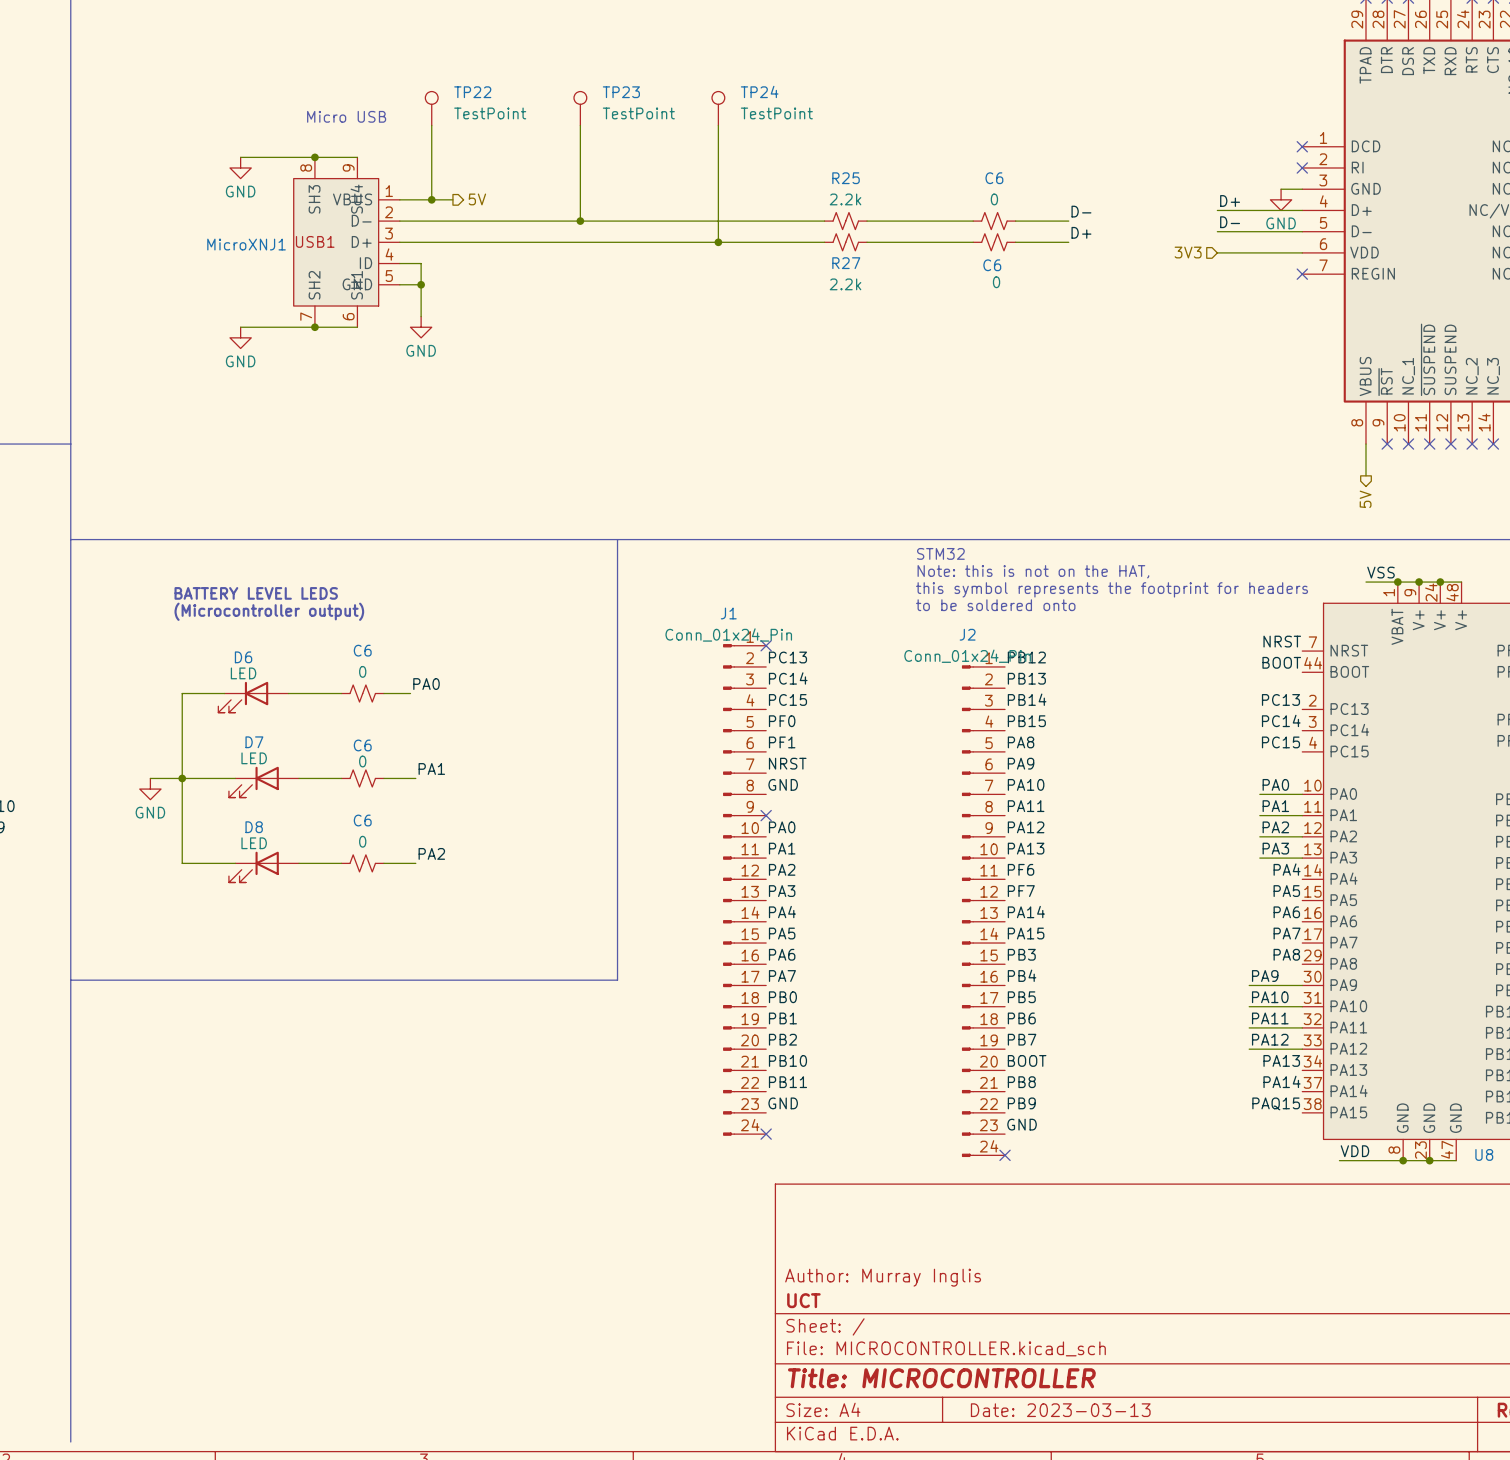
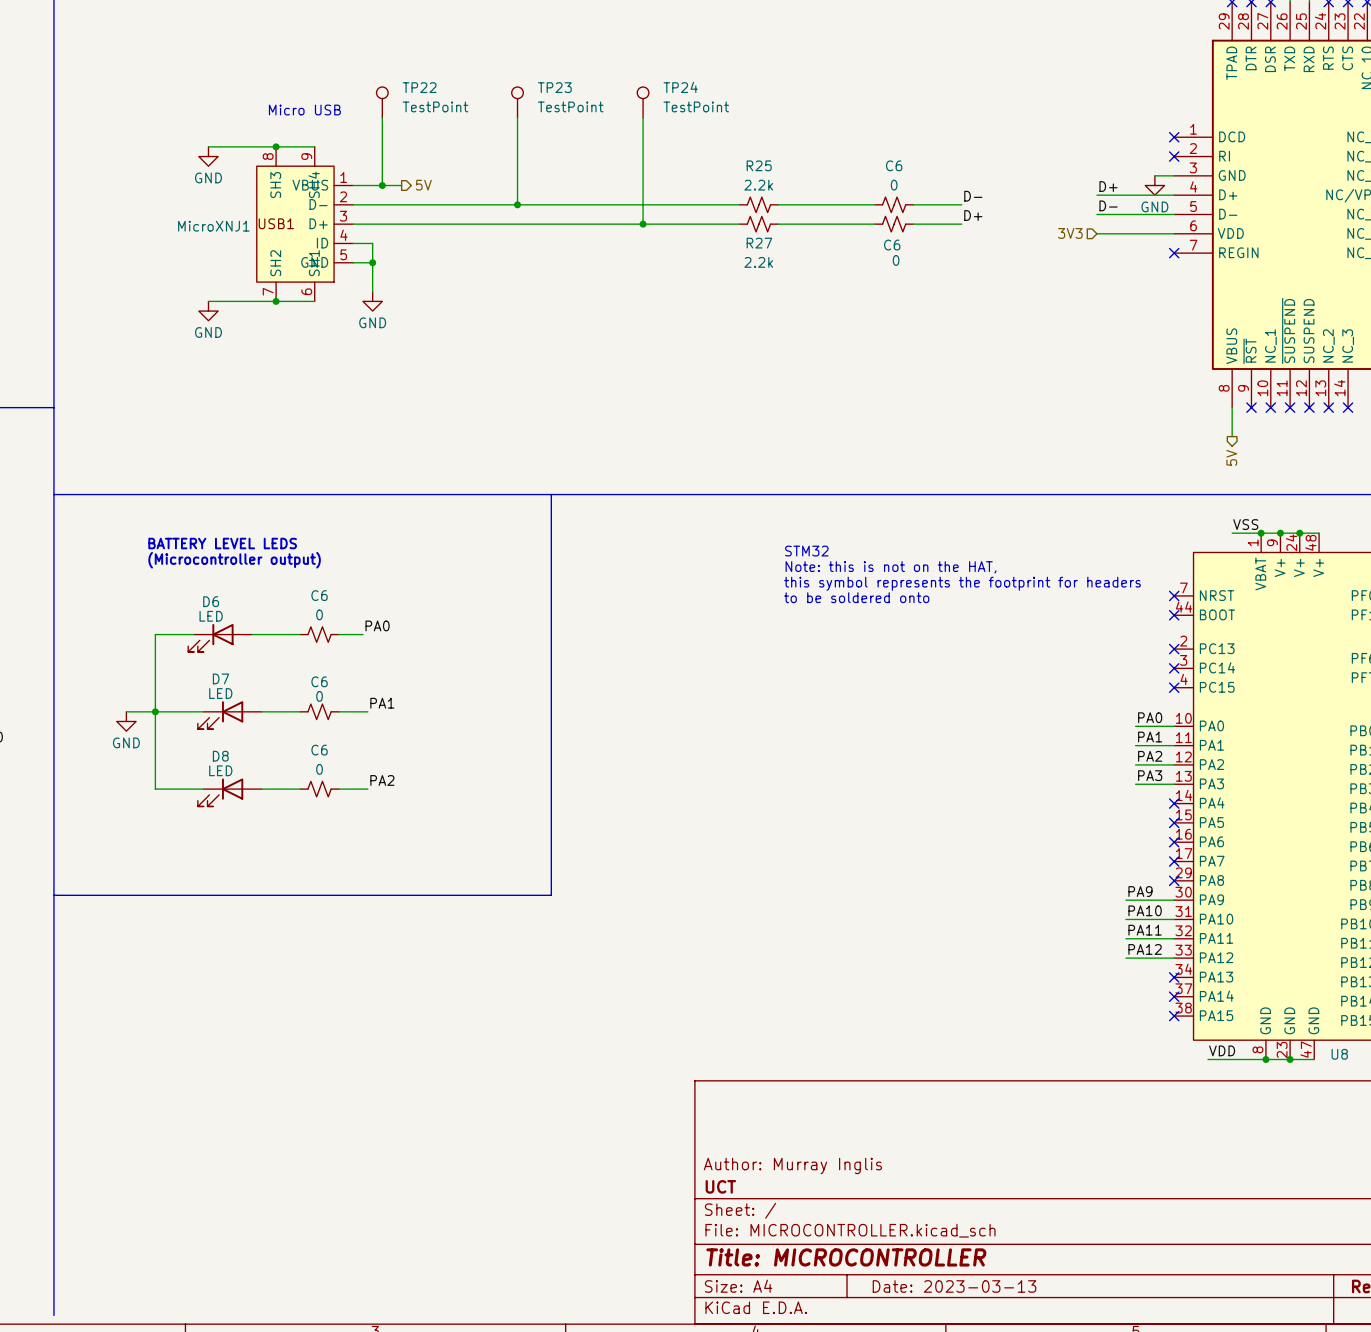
text position: STM32 (940, 553) -> STM32 (806, 551)
text position: Note: this is not on the HAT, (1033, 571) -> Note: this is not on the HAT, (891, 567)
text position: this symbol represents the footprint for headers (1112, 589) -> this symbol represents the footprint for headers (962, 583)
text position: to be soldered onto (995, 605) -> to be soldered onto (856, 597)
label: NRST (1282, 641) -> none
no-connect mark: (766, 645) -> none
no-connect mark: none -> (1174, 595)
label: PC13 (787, 657) -> none
label: PB12 (1026, 657) -> none
label: BOOT (1281, 662) -> none
no-connect mark: none -> (1174, 615)
label: PC14 (788, 678) -> none
label: PB13 (1026, 678) -> none
label: PC15 (787, 699) -> none
label: PB14 (1027, 699) -> none
label: PC13 (1280, 699) -> none
no-connect mark: none -> (1174, 649)
label: PC14 (1281, 720) -> none
label: PF0 (782, 721) -> none
label: PB15 (1026, 721) -> none
no-connect mark: none -> (1174, 668)
label: PF1 (782, 742) -> none
label: PA8 (1021, 742) -> none
label: PC15 (1280, 742) -> none
no-connect mark: none -> (1174, 687)
label: NRST (787, 763) -> none
label: PA9 (1021, 763) -> none
label: GND (783, 784) -> none
label: PA10 (1026, 784) -> none
label: PA11 (1026, 806) -> none
no-connect mark: (766, 815) -> none
label: PA0 (782, 827) -> none
label: PA12 (1026, 827) -> none
label: PA1 (782, 848) -> none
label: PA13 (1026, 848) -> none
label: PA2 (782, 869) -> none
label: PF6 (1021, 869) -> none
label: PA4 (1287, 869) -> none
no-connect mark: none -> (1174, 803)
J1: Conn_01x24_Pin (744, 889) -> none
label: PA3 (782, 891) -> none
label: PF7 (1021, 891) -> none
label: PA5 (1286, 891) -> none
no-connect mark: none -> (1174, 822)
J2: Conn_01x24_Pin (983, 911) -> none
label: PA4 (782, 912) -> none
label: PA14 (1026, 912) -> none
label: PA6 (1286, 912) -> none
no-connect mark: none -> (1174, 842)
label: PA5 (782, 933) -> none
label: PA15 (1026, 933) -> none
label: PA7 (1287, 933) -> none
no-connect mark: none -> (1174, 861)
label: PA6 (782, 954) -> none
label: PB3 (1021, 954) -> none
label: PA8 (1286, 954) -> none
no-connect mark: none -> (1174, 880)
label: PB4 (1022, 975) -> none
label: PA7 (782, 976) -> none
label: PB0 (782, 997) -> none
label: PB5 (1021, 997) -> none
label: PB1 (782, 1018) -> none
label: PB6 (1021, 1018) -> none
label: PB2 (782, 1039) -> none
label: PB7 (1022, 1039) -> none
label: PB10 (787, 1060) -> none
label: BOOT (1027, 1060) -> none
label: PA13 (1281, 1060) -> none
no-connect mark: none -> (1174, 977)
label: PA14 (1281, 1081) -> none
label: PB11 (787, 1082) -> none
label: PB8 (1021, 1082) -> none
no-connect mark: none -> (1174, 996)
label: GND (783, 1103) -> none
label: PB9 (1021, 1103) -> none
label: PAQ15 (1276, 1103) -> none
no-connect mark: none -> (1174, 1016)
label: GND (1022, 1124) -> none
no-connect mark: (766, 1134) -> none
no-connect mark: (1005, 1155) -> none

